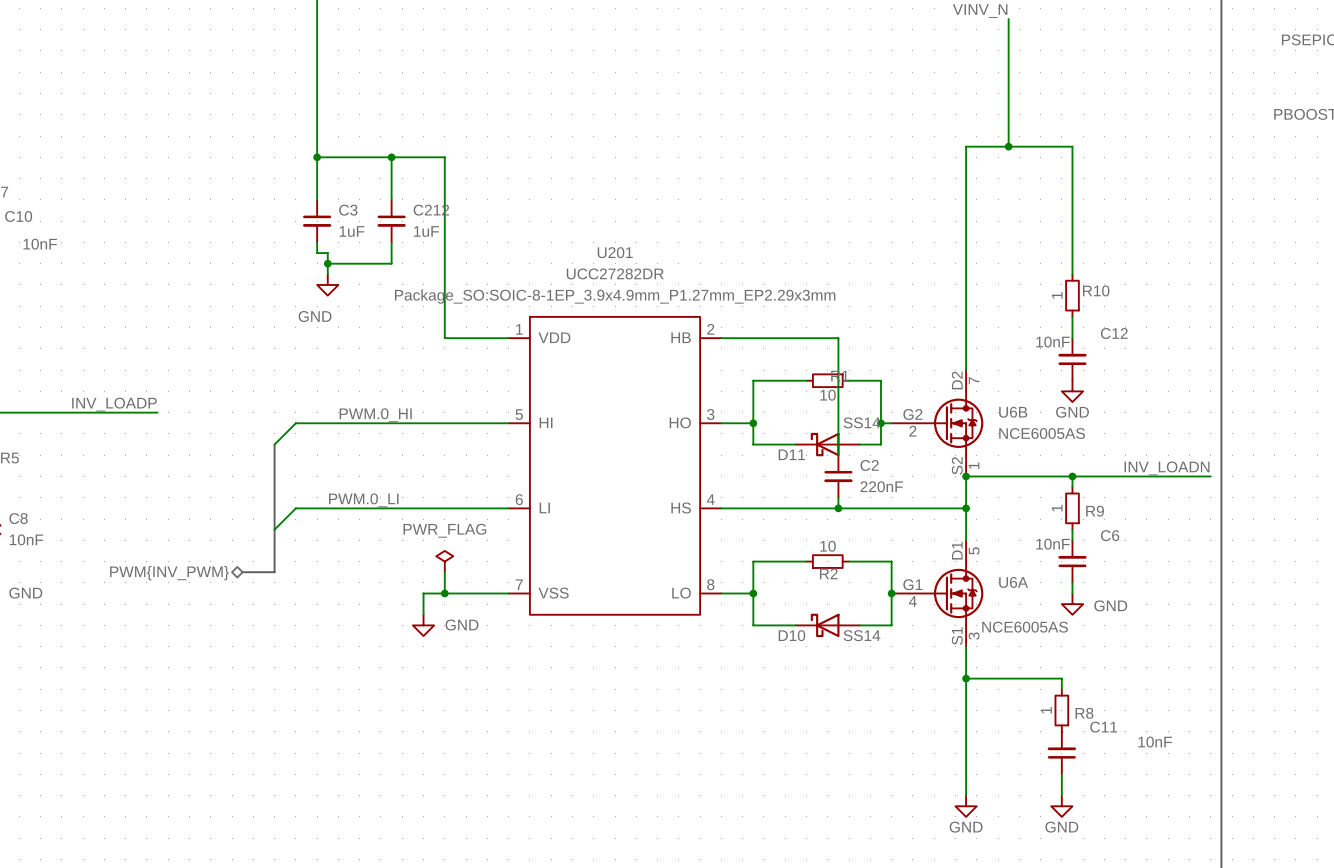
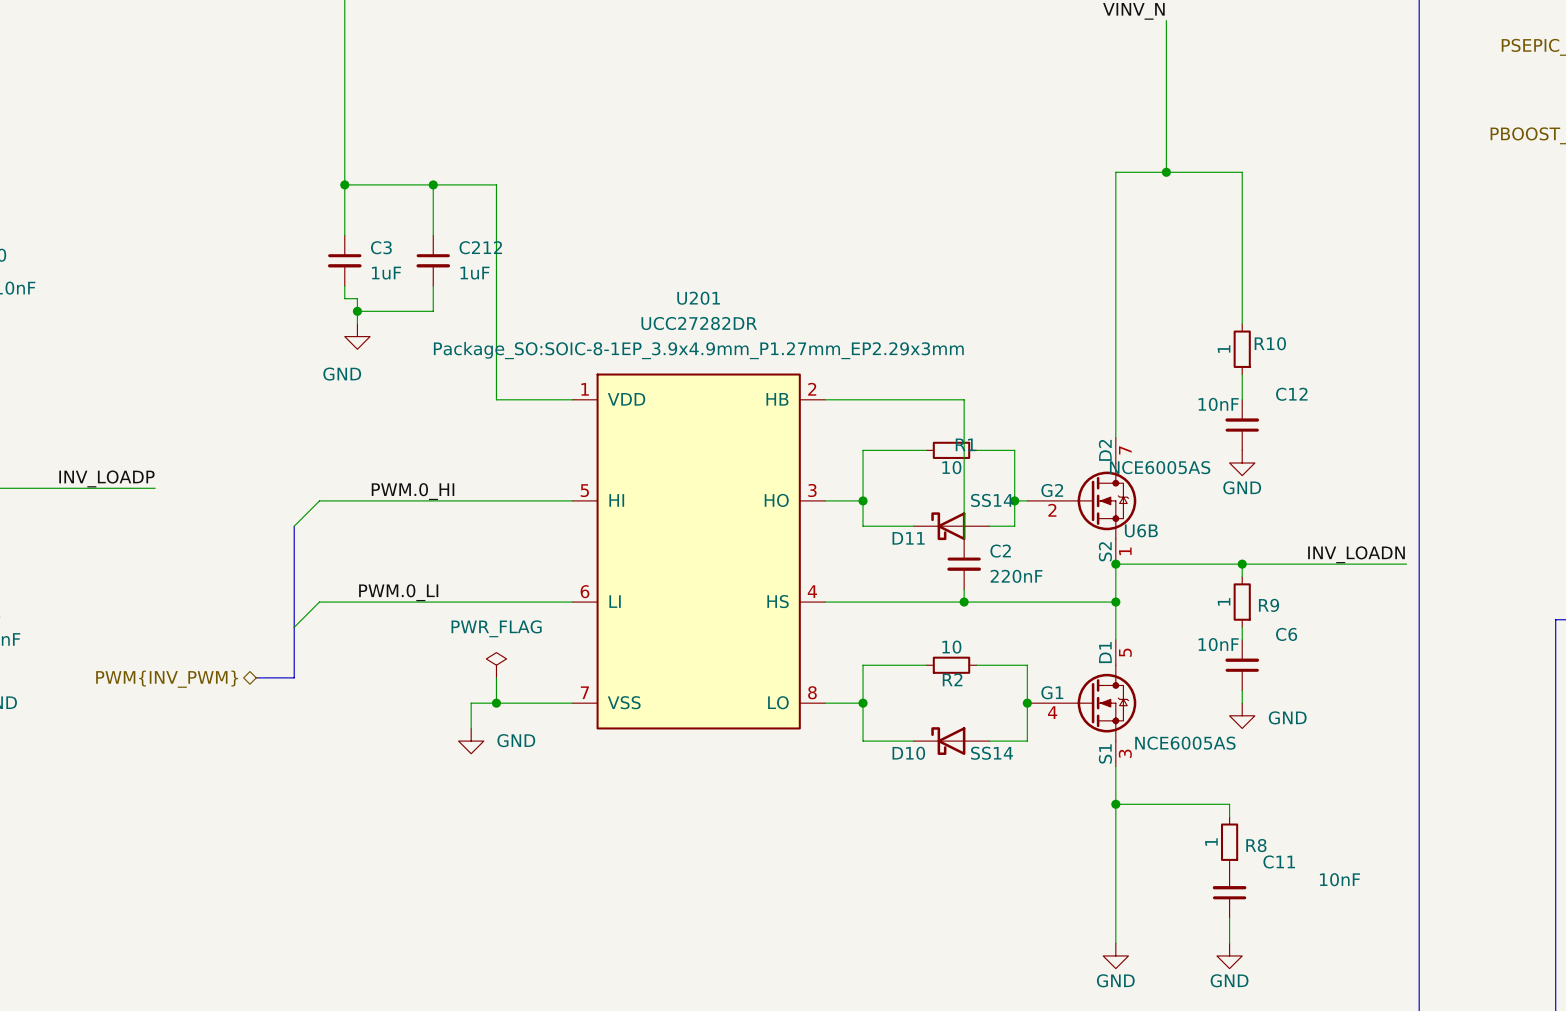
U6B name position: U6B (1013, 412) -> U6B (1141, 530)
U6B value position: NCE6005AS (1042, 433) -> NCE6005AS (1160, 467)
U6A name: U6A (1013, 582) -> none

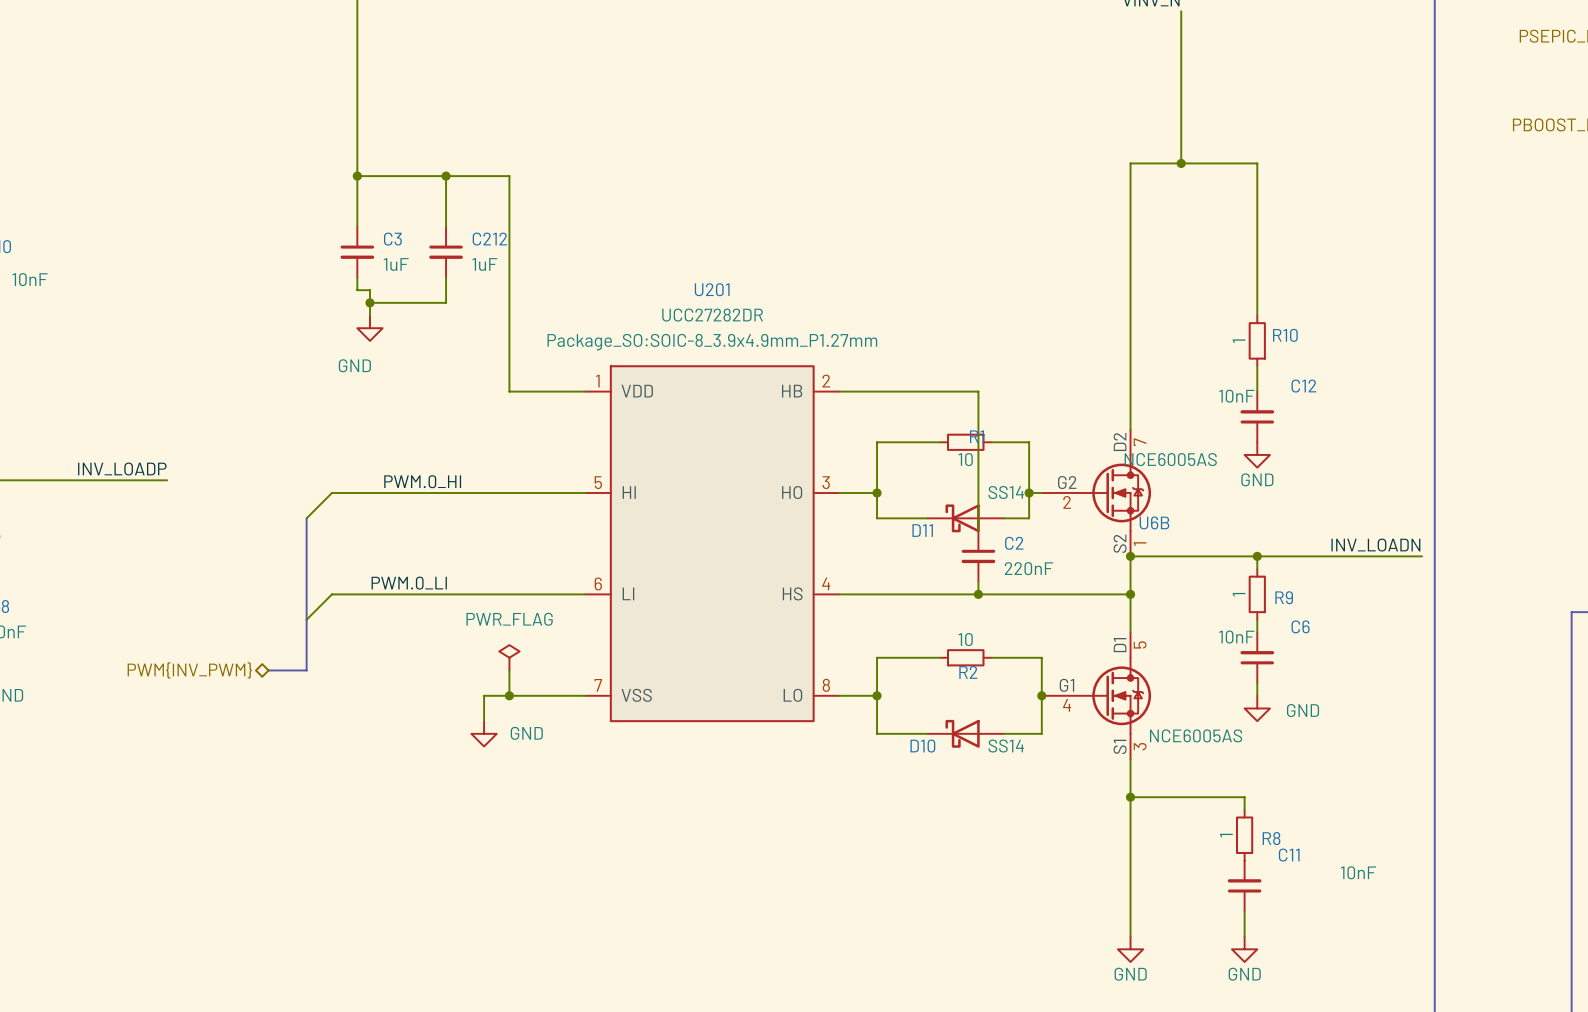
U201 text: Package_SO:SOIC-8-1EP_3.9x4.9mm_P1.27mm_EP2.29x3mm (698, 350) -> Package_SO:SOIC-8_3.9x4.9mm_P1.27mm (712, 342)

